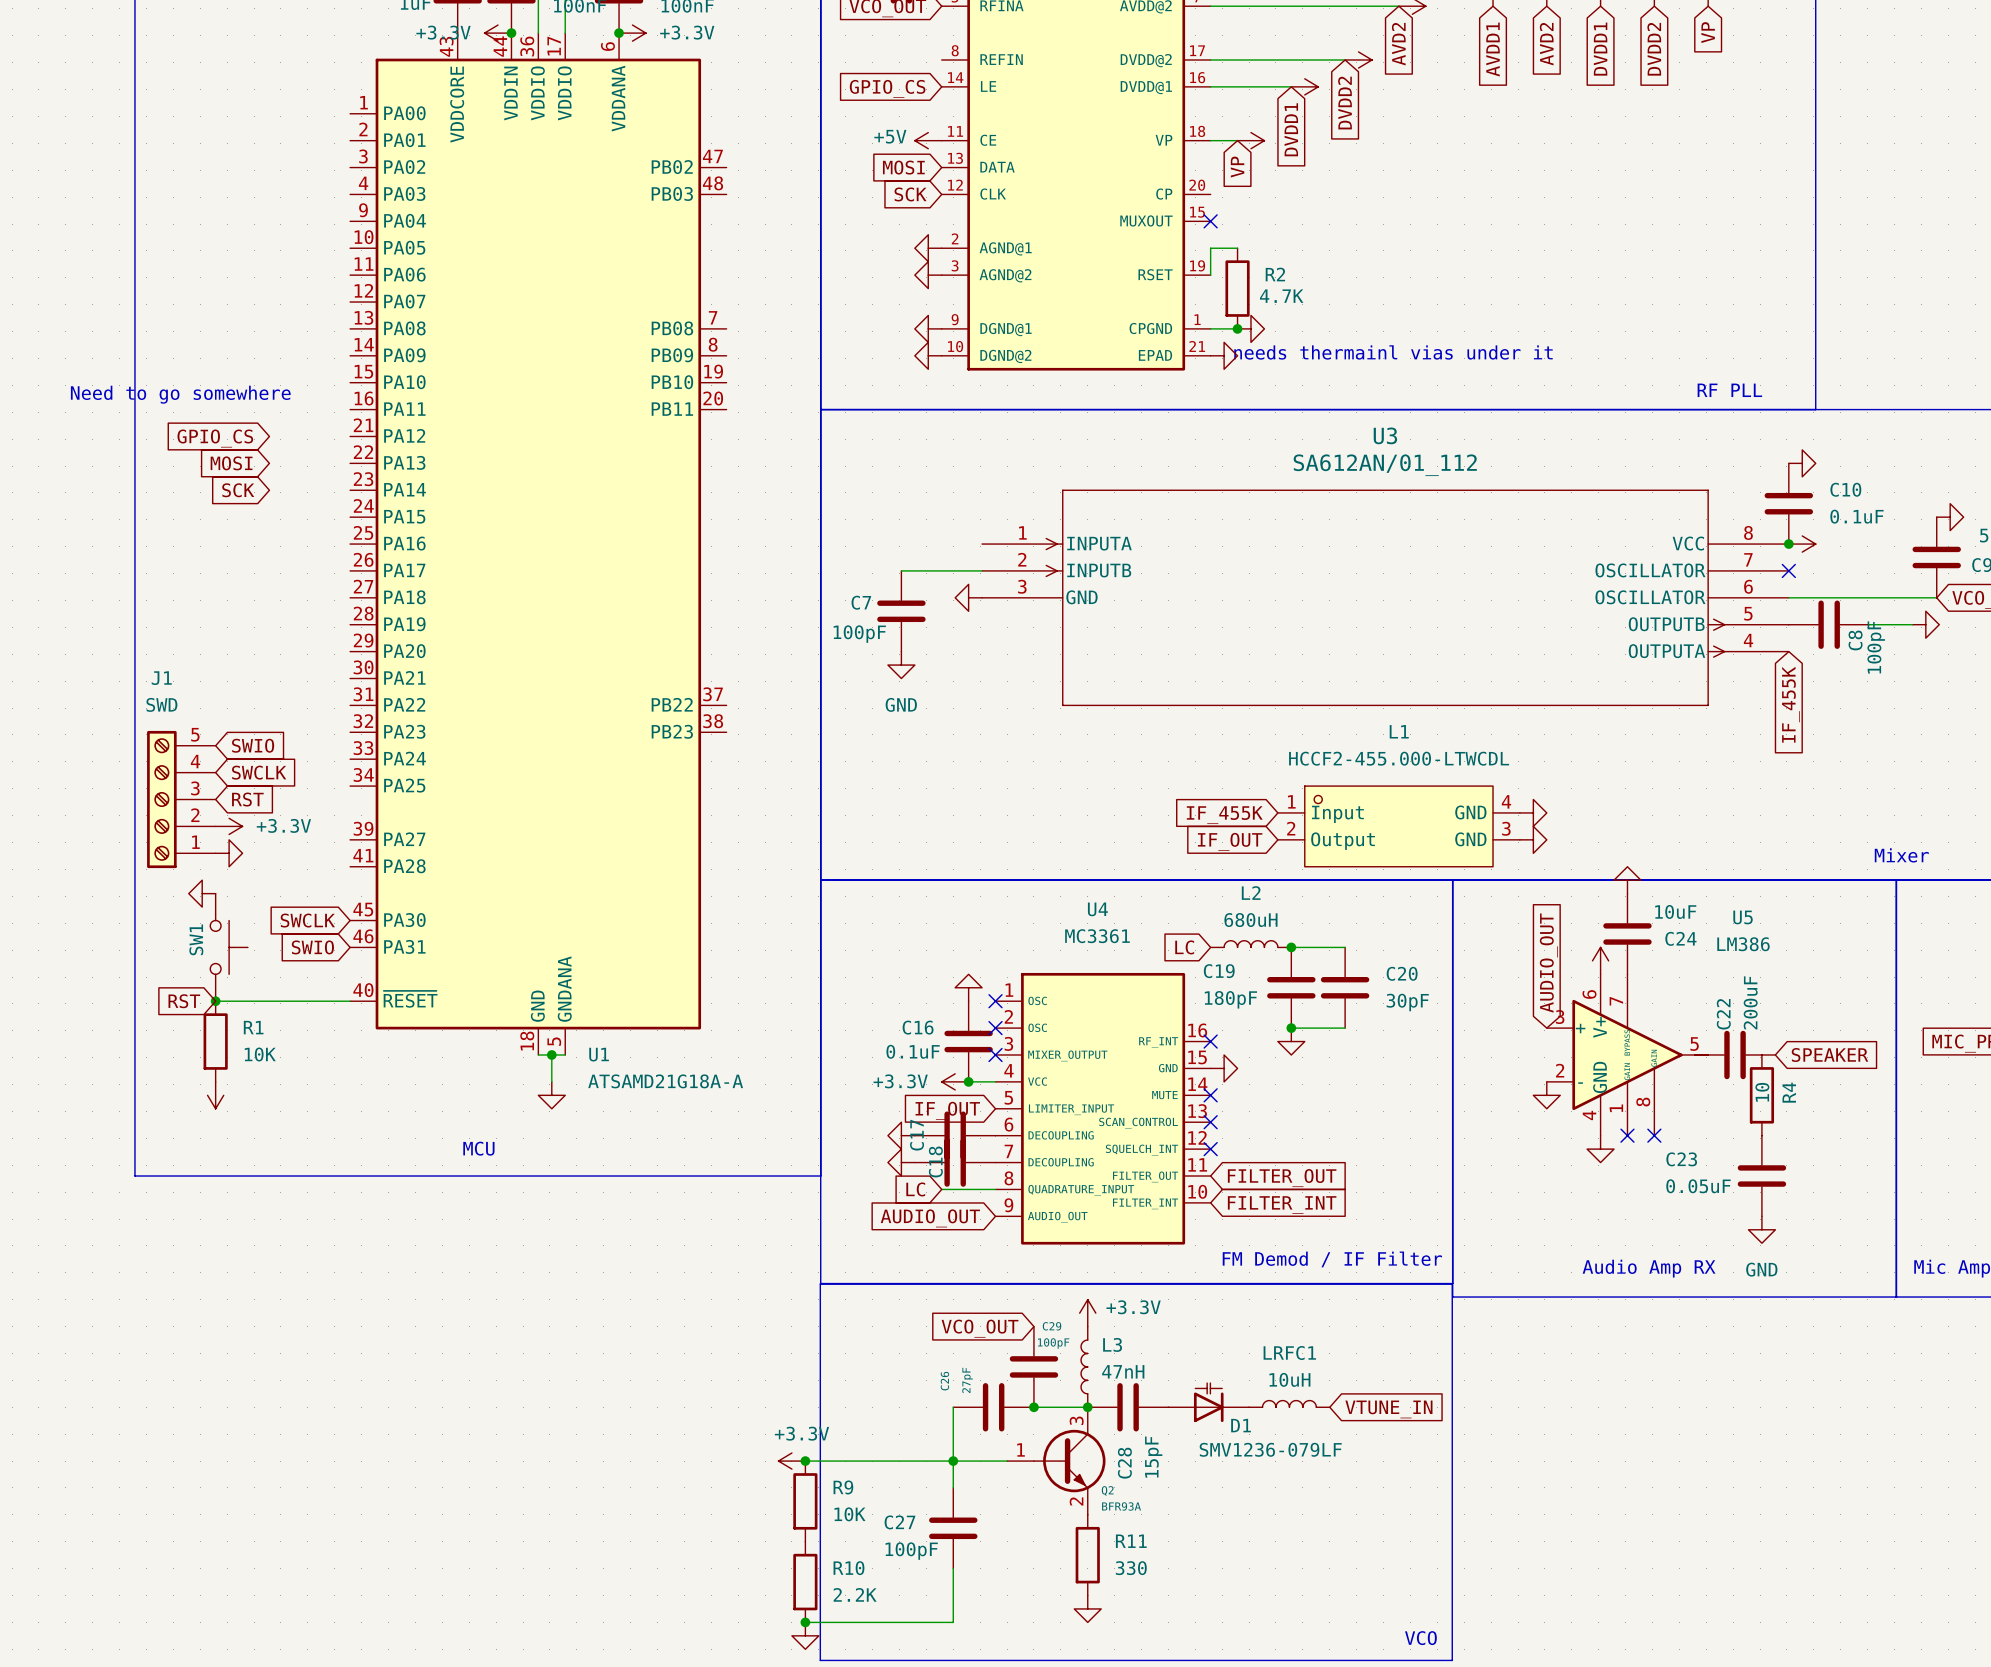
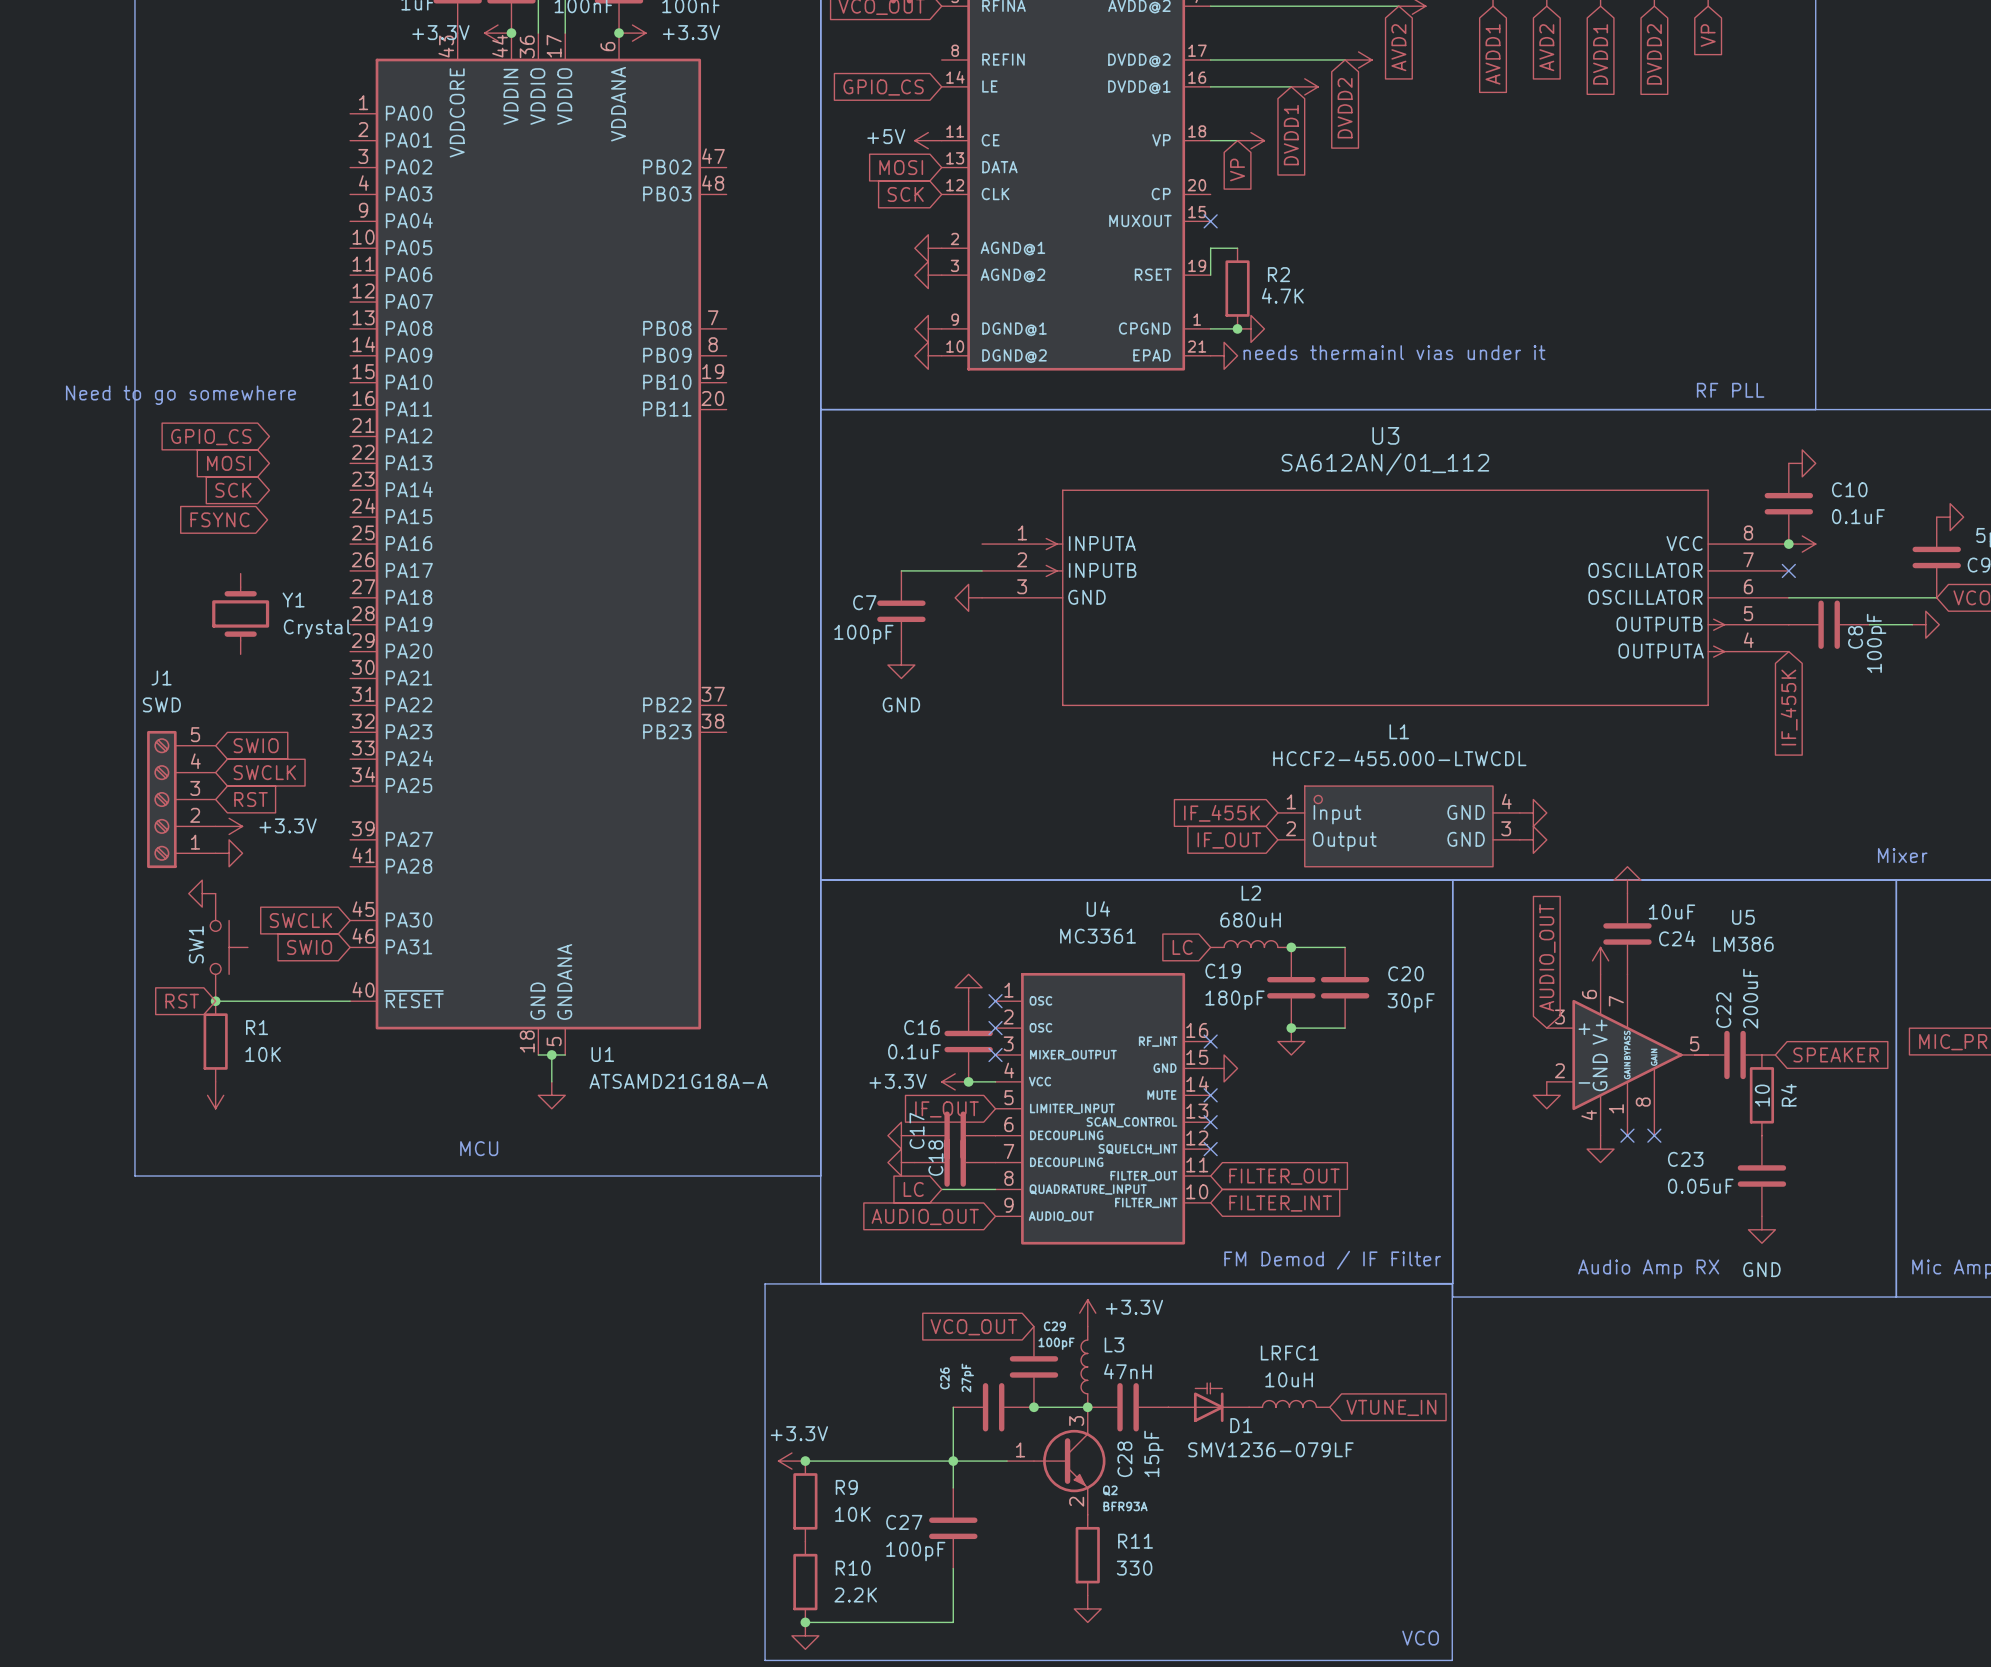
global label: none -> FSYNC (219, 519)
Y1: none -> Crystal (240, 613)
line: (820, 1283) (820, 1660) -> (820, 1283) (765, 1283) (765, 1660) (820, 1660)

